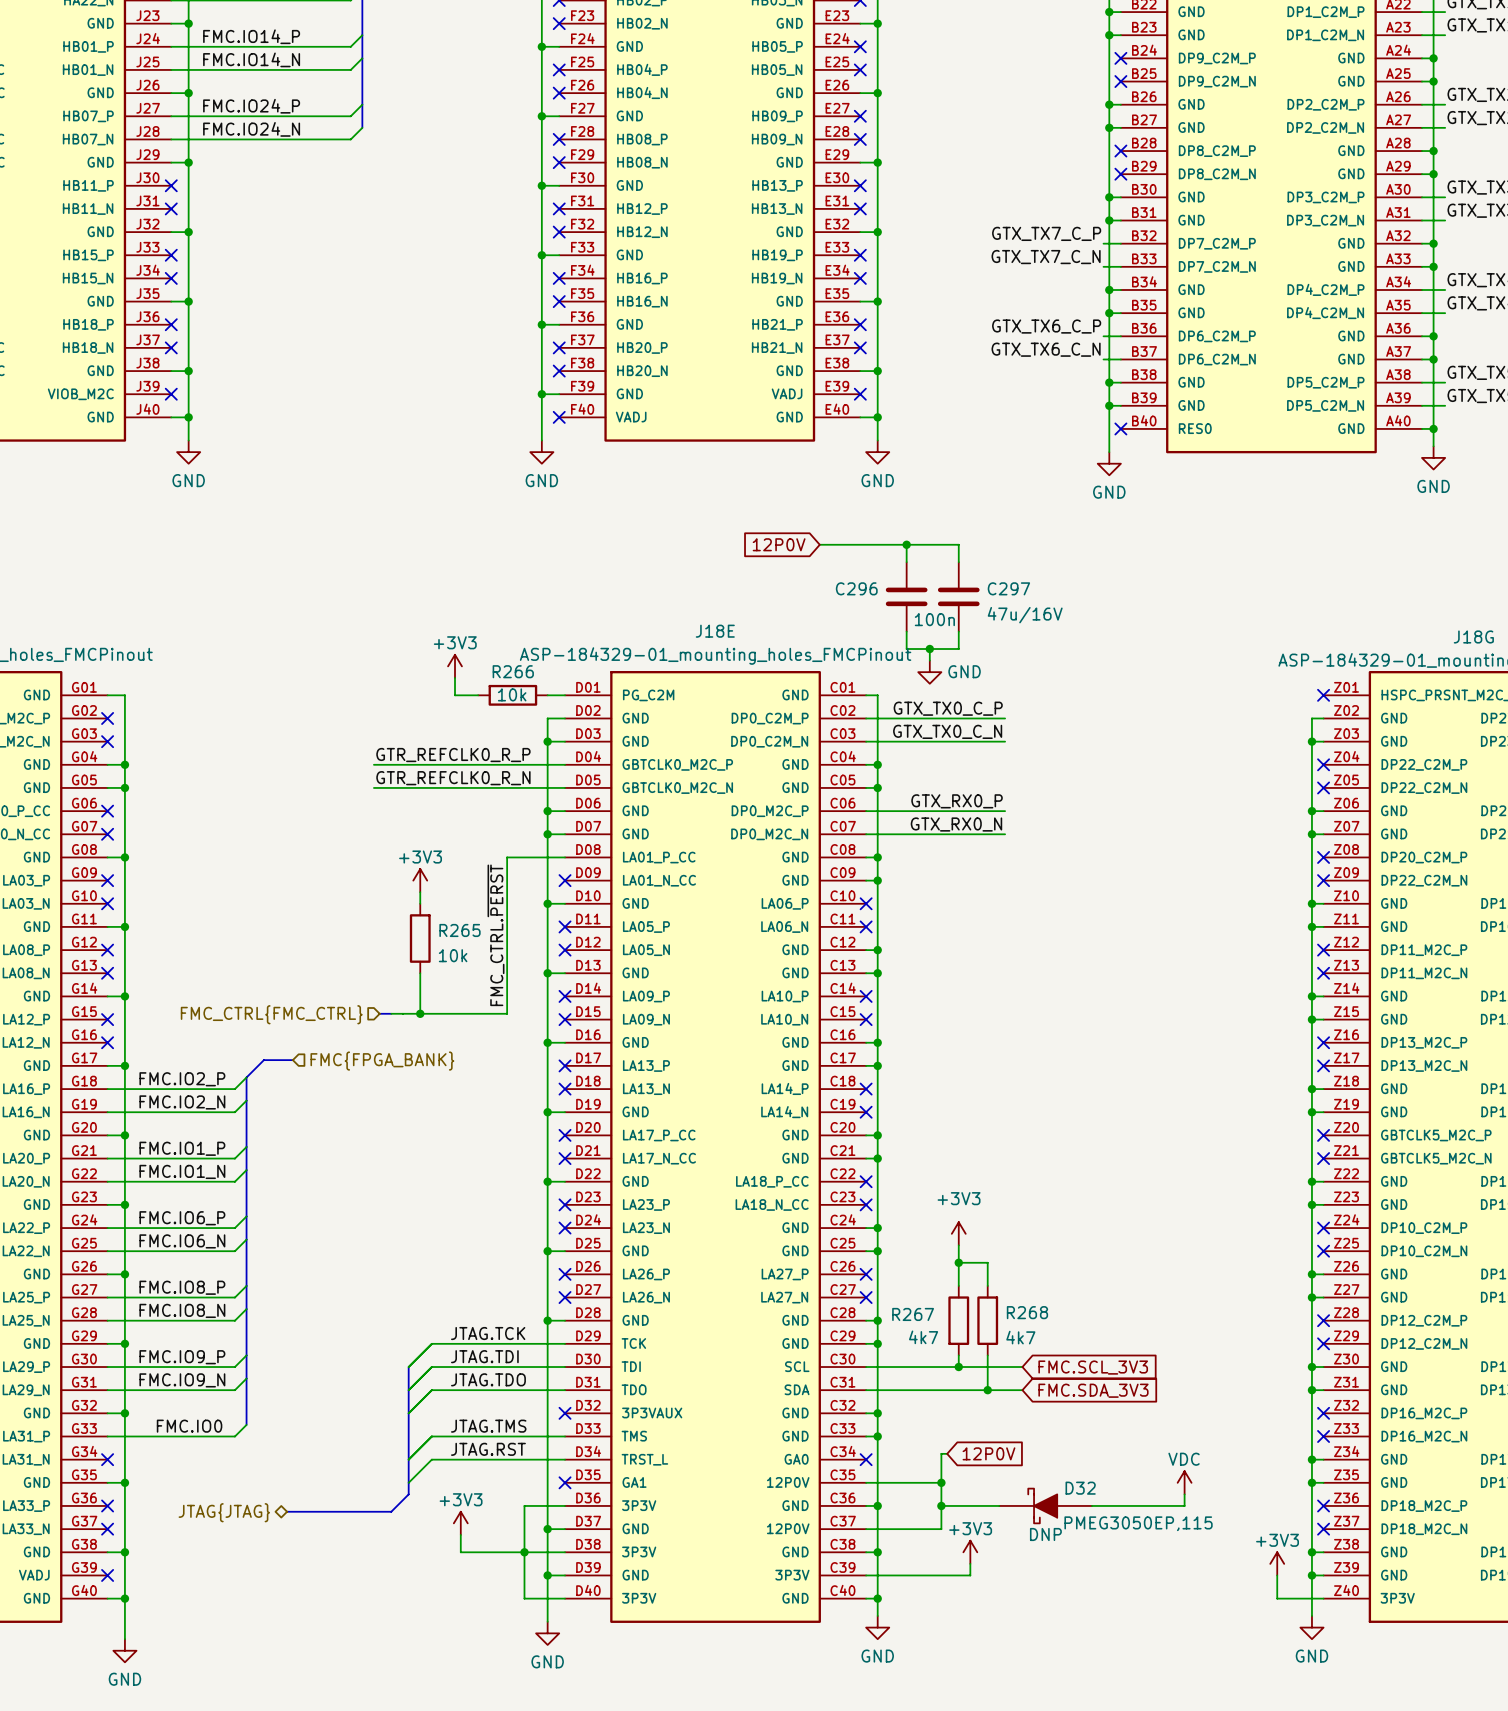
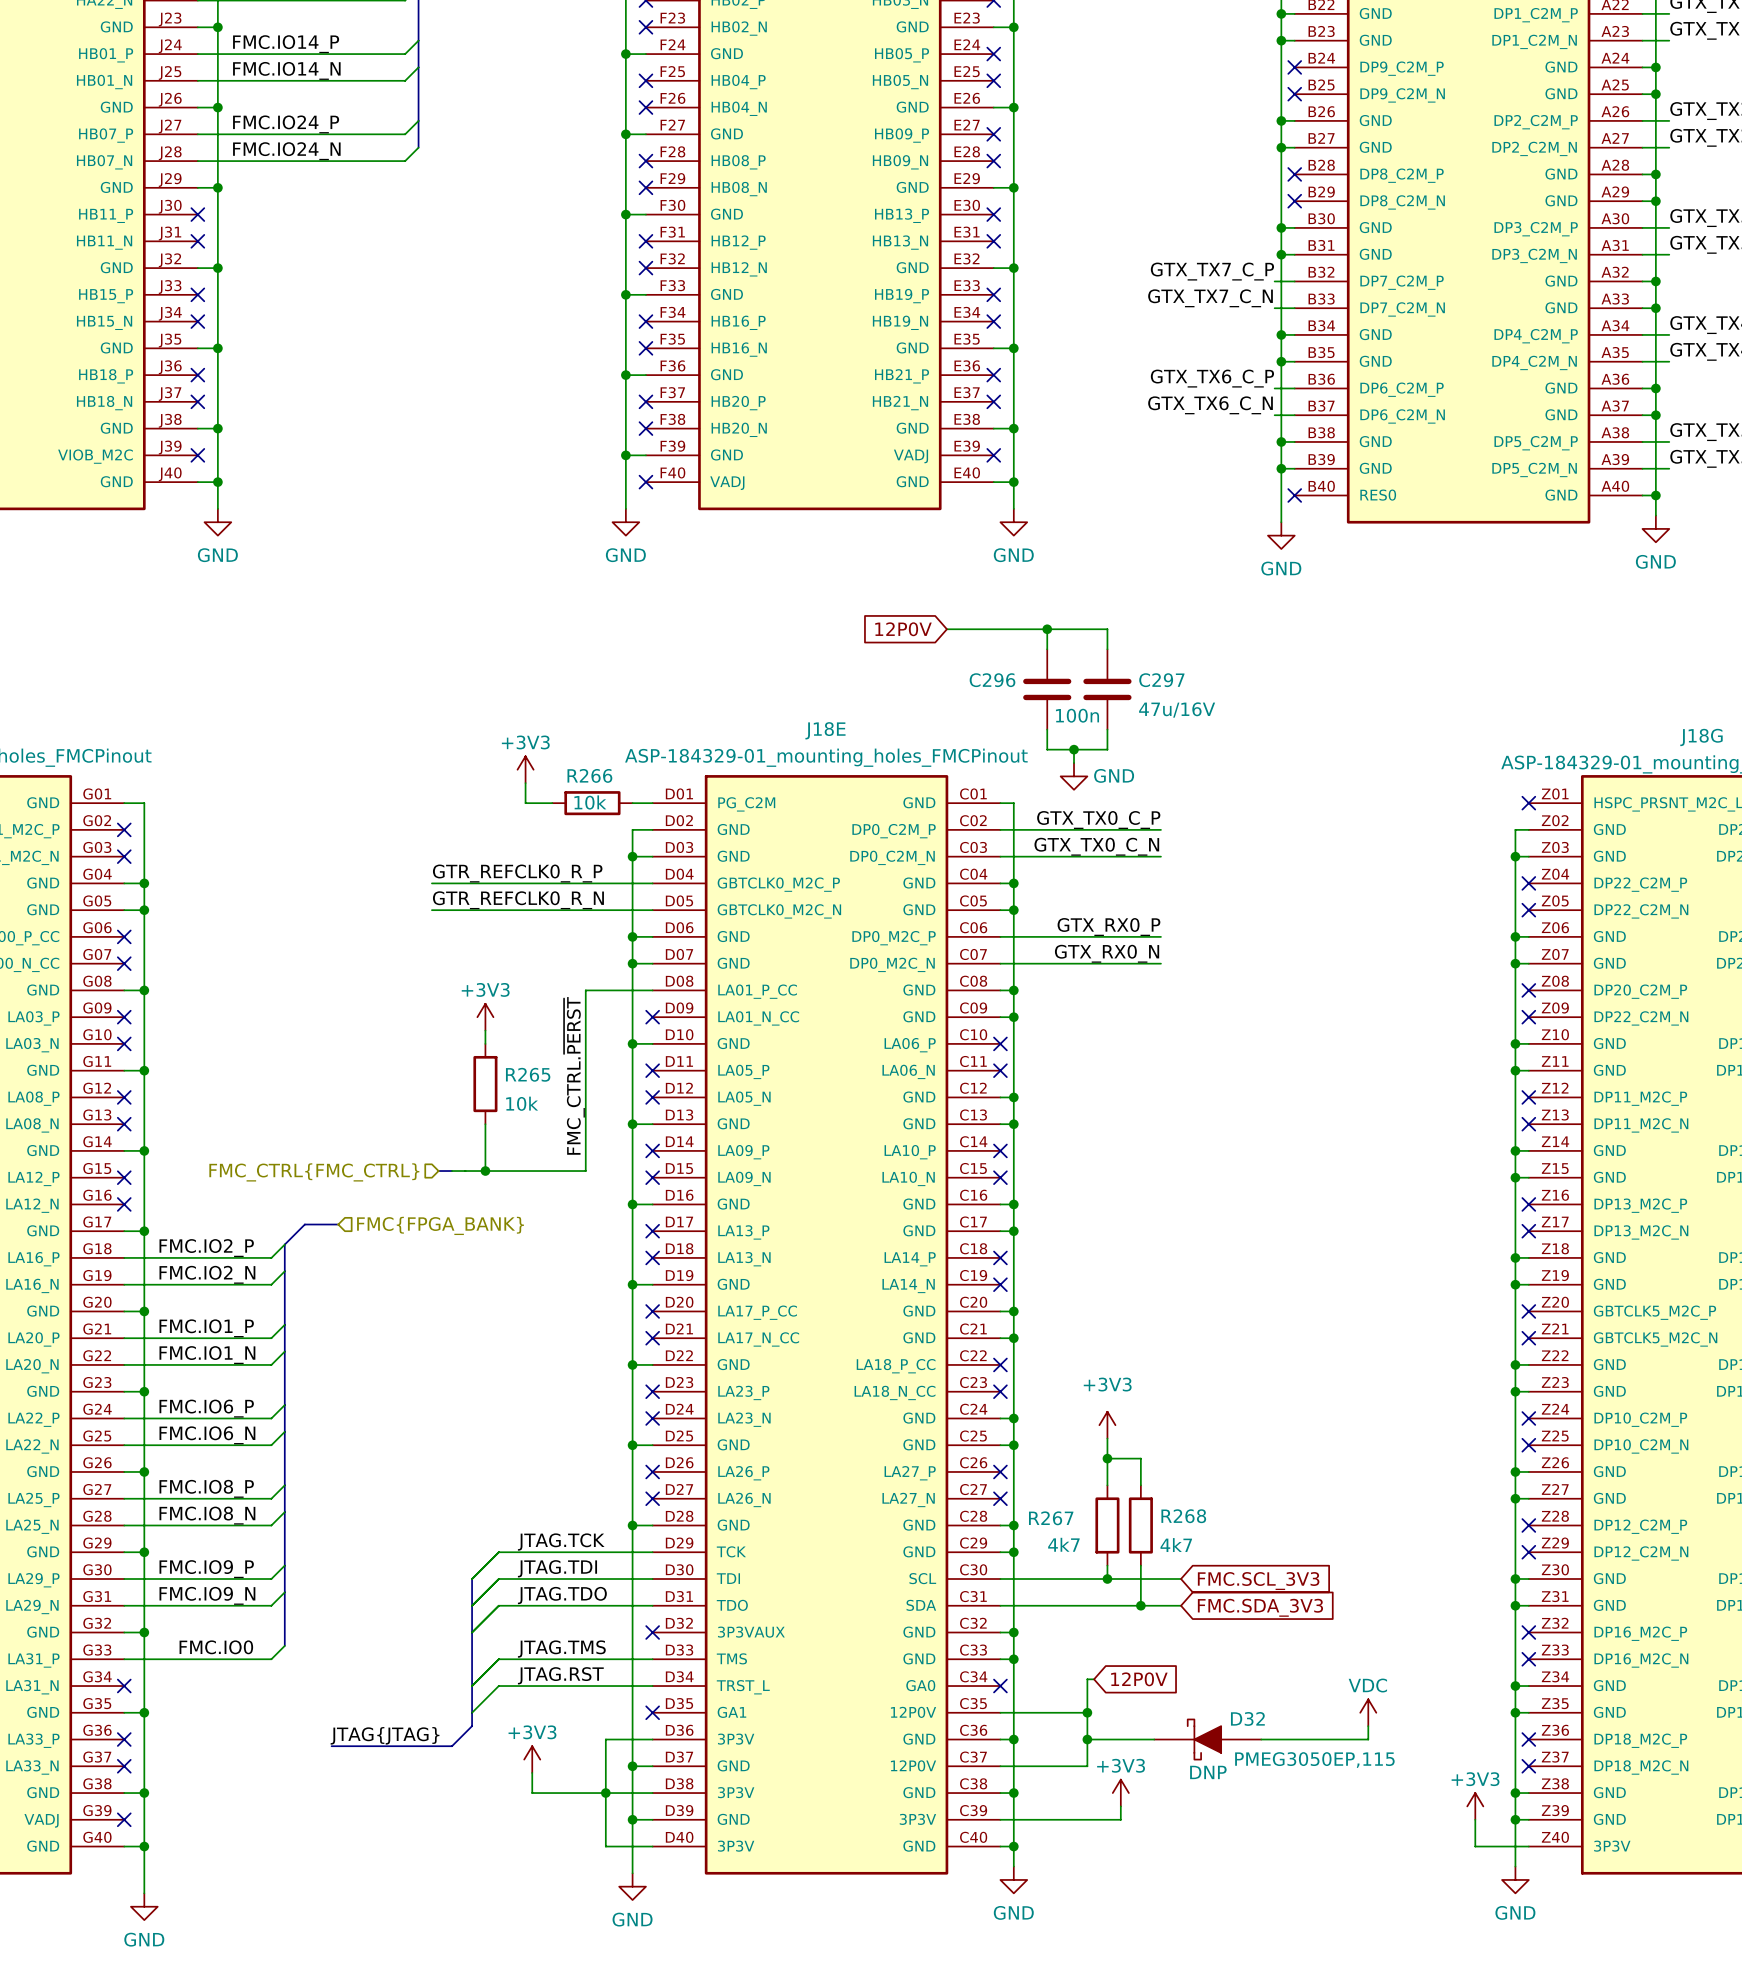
label: none -> JTAG{JTAG} (385, 1735)
hierarchical label: JTAG{JTAG} (224, 1512) -> none

